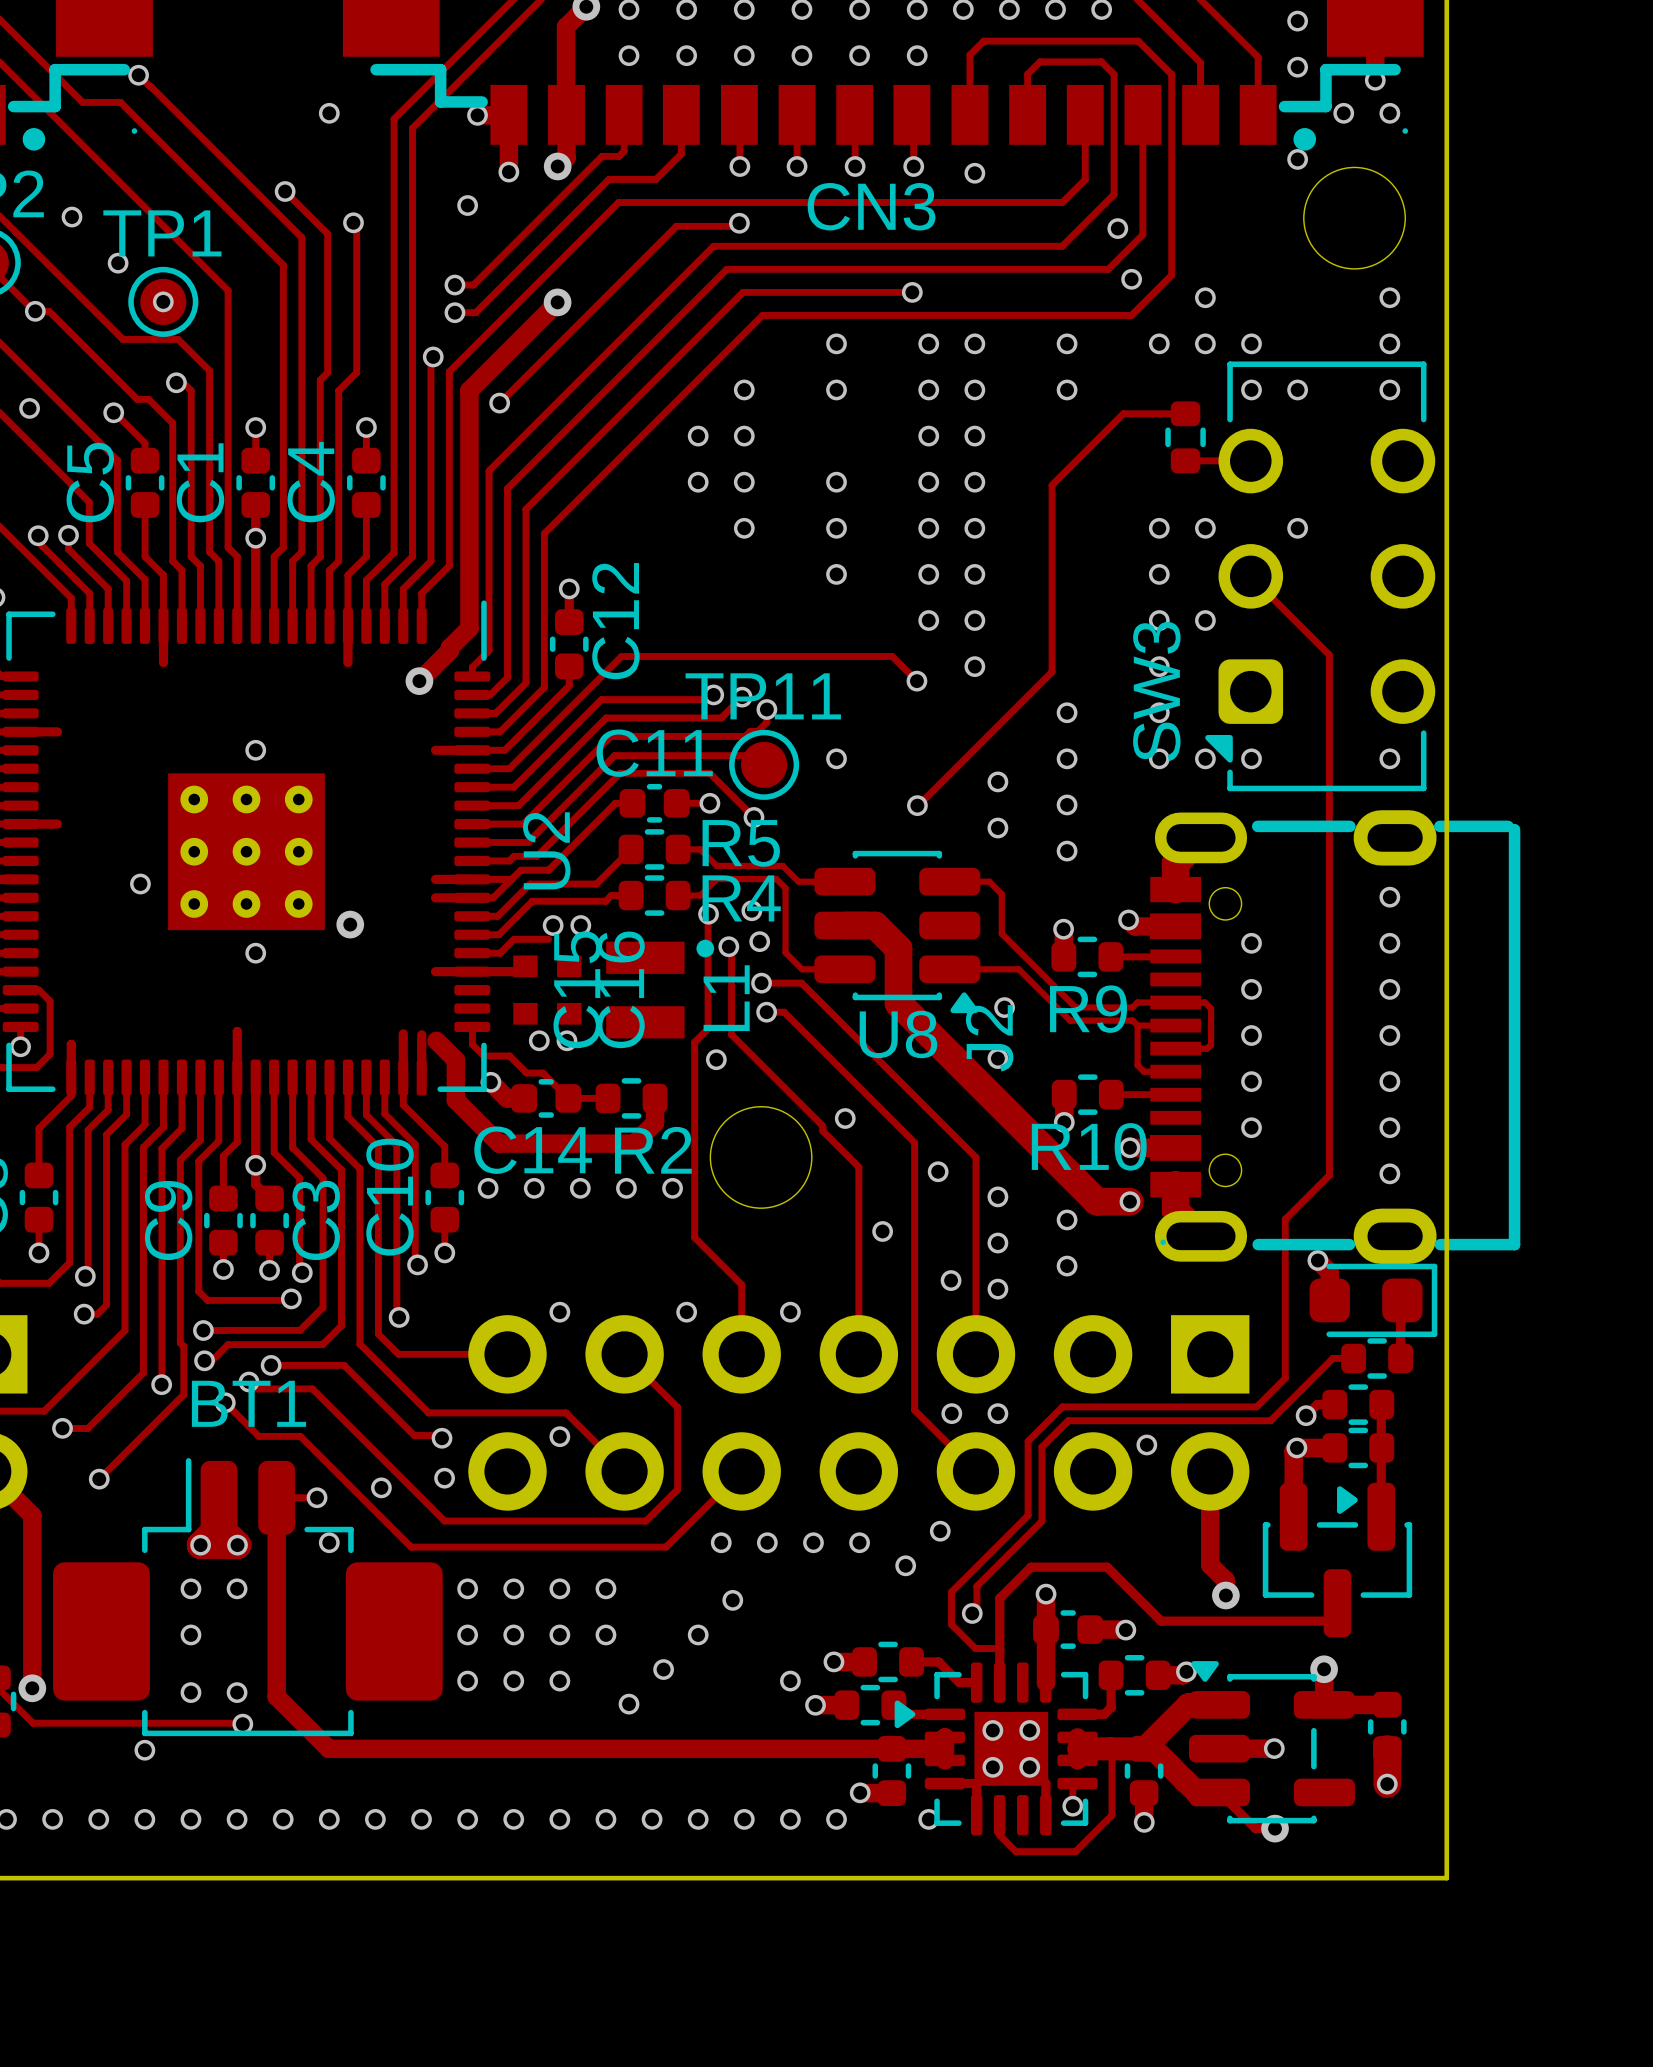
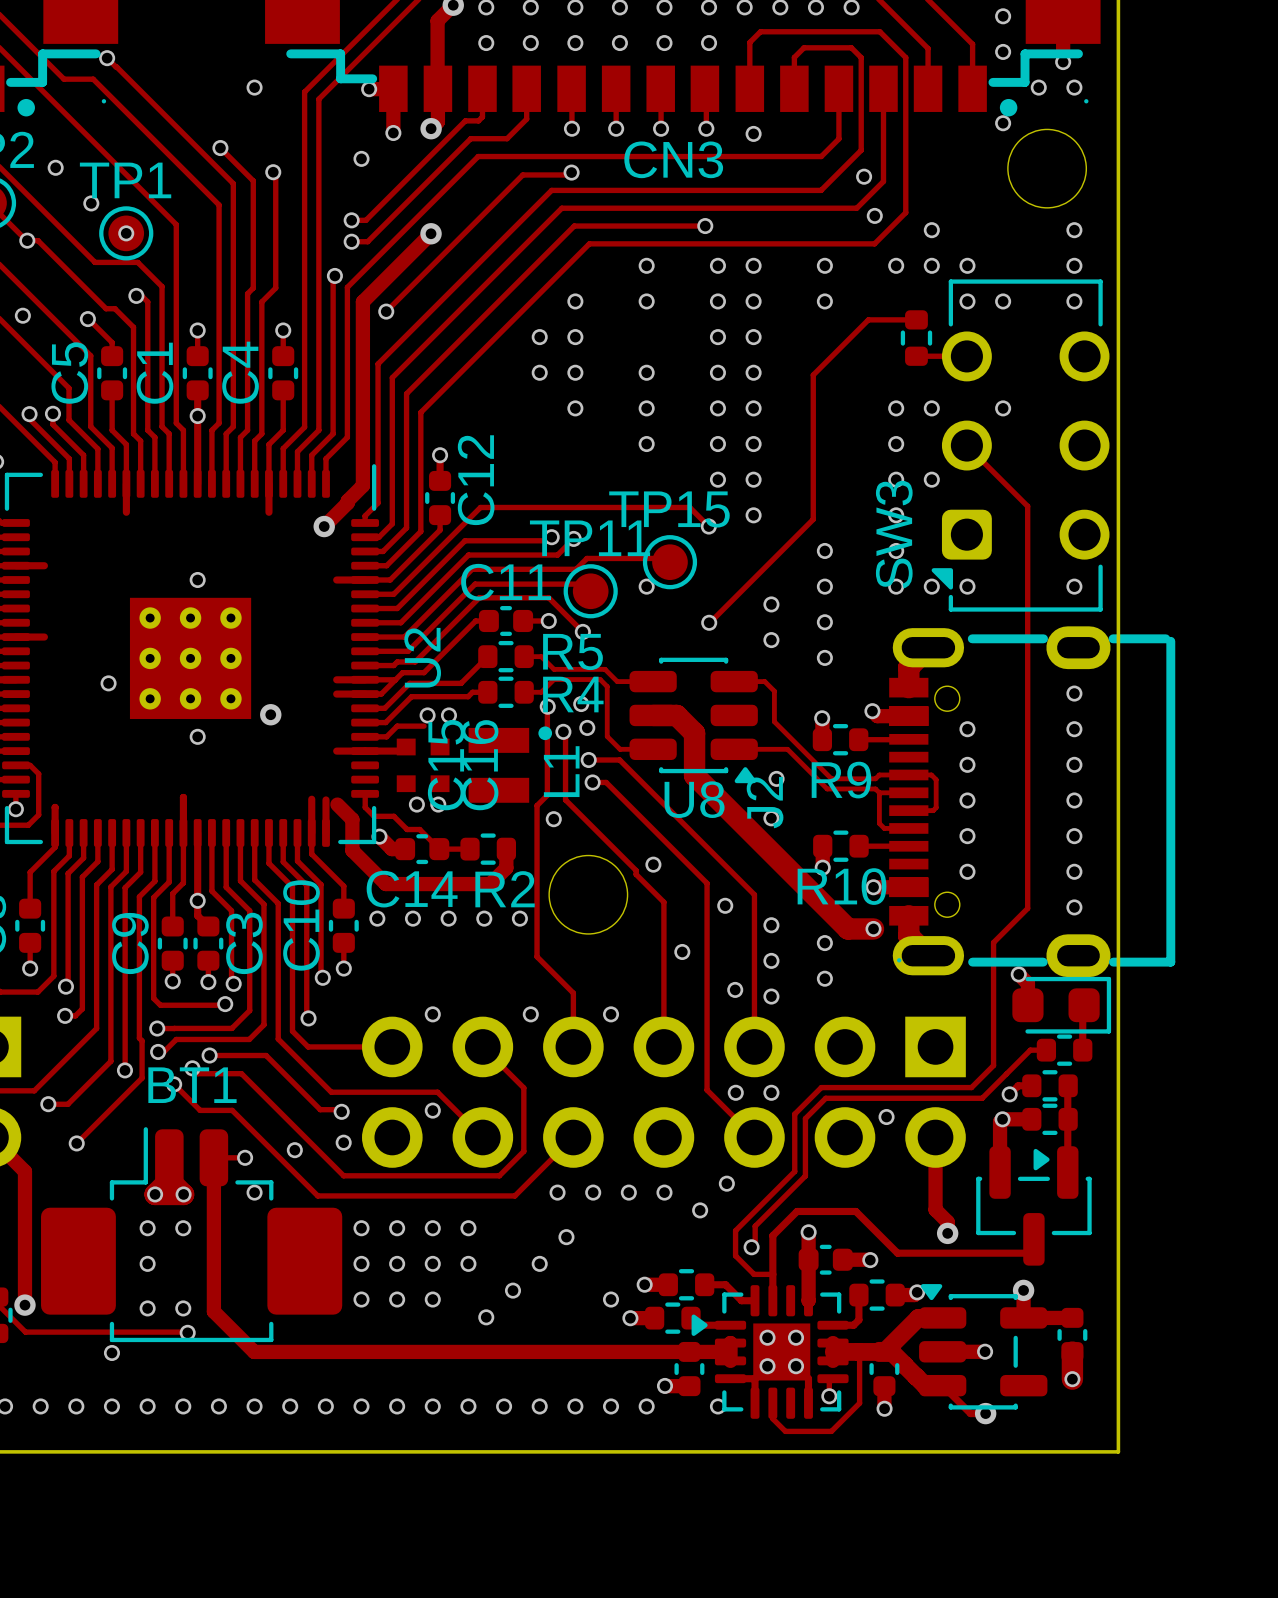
track: (766, 709) (766, 722) (757, 731) (750, 731) -> (669, 562) (666, 558) (586, 558) (579, 565)
via: (766, 709) -> none
TP15: none -> (669, 562)

